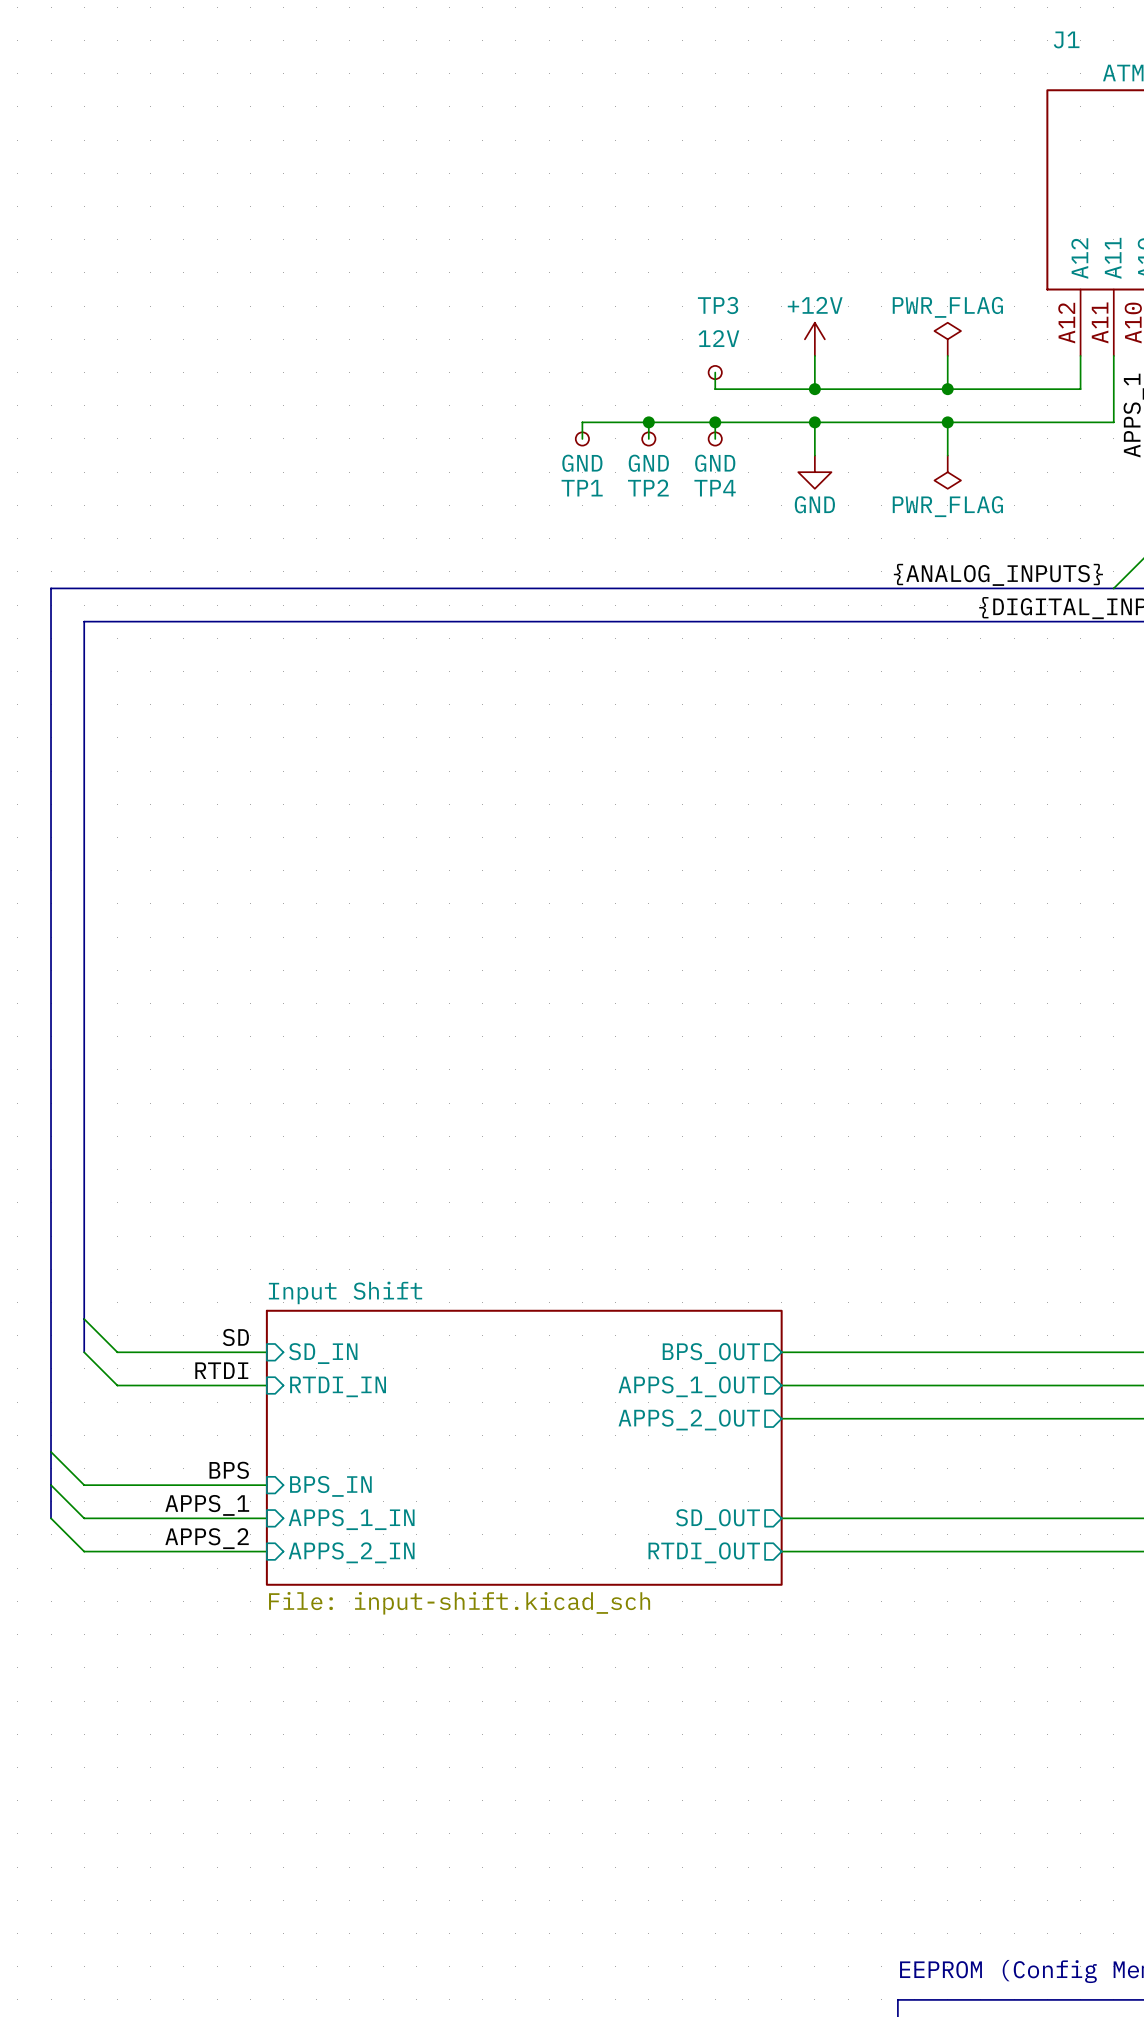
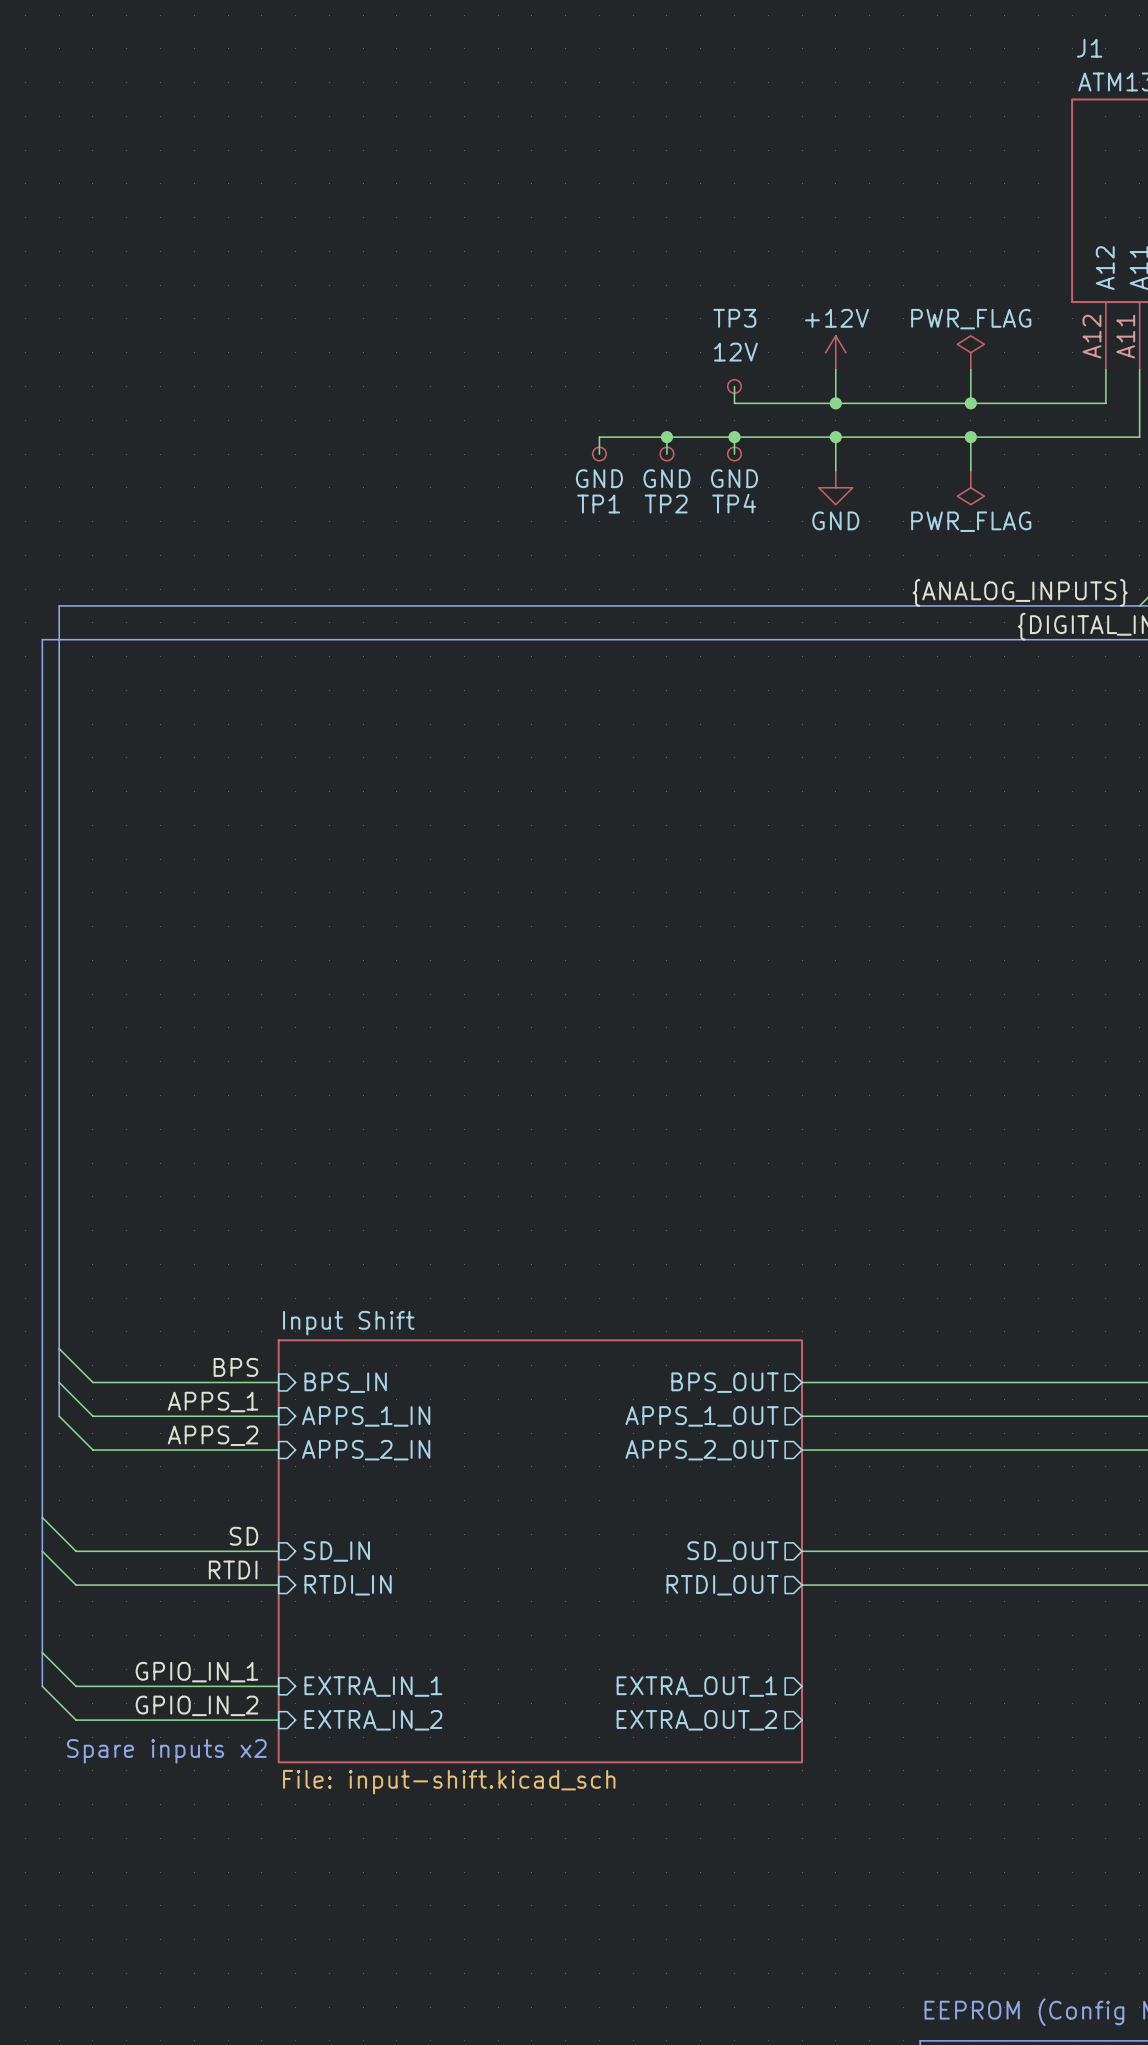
bus: (84, 621) (84, 1352) -> (92, 639) (42, 639) (42, 1686)
wire: (84, 1319) (117, 1352) -> (59, 1348) (92, 1382) (126, 1382)
label: SD (235, 1337) -> BPS (235, 1367)
wire: (84, 1352) (117, 1385) -> (59, 1382) (92, 1416) (126, 1416)
sheet pin: SD_IN (323, 1353) -> BPS_IN (345, 1382)
label: RTDI (221, 1370) -> APPS_1 (213, 1401)
bus: (51, 1385) (51, 1518) -> none
sheet pin: RTDI_IN (338, 1386) -> APPS_1_IN (366, 1416)
label: none -> APPS_2 (213, 1435)
sheet pin: none -> APPS_2_IN (366, 1450)
sheet Input Shift: File: input-shift.kicad_sch (524, 1447) -> none
wire: (51, 1451) (84, 1485) (266, 1485) -> (59, 1416) (92, 1450) (278, 1450)
label: BPS (229, 1470) -> none
wire: (51, 1485) (84, 1518) -> (42, 1517) (76, 1551) (92, 1551)
sheet pin: BPS_IN (330, 1486) -> none
label: APPS_1 (207, 1505) -> SD (243, 1536)
wire: (51, 1518) (84, 1551) -> (42, 1551) (76, 1585) (92, 1585)
sheet Input Shift: none -> File: input-shift.kicad_sch (540, 1551)
sheet pin: APPS_1_IN (351, 1519) -> SD_IN (336, 1551)
label: APPS_2 (207, 1538) -> RTDI (233, 1570)
sheet pin: APPS_2_IN (351, 1552) -> RTDI_IN (348, 1585)
wire: none -> (42, 1652) (76, 1686) (278, 1686)
label: none -> GPIO_IN_1 (196, 1672)
wire: none -> (42, 1686) (76, 1720) (278, 1720)
sheet pin: none -> EXTRA_IN_1 (373, 1686)
sheet pin: none -> EXTRA_OUT_1 (696, 1686)
label: none -> GPIO_IN_2 (196, 1705)
sheet pin: none -> EXTRA_IN_2 (373, 1720)
sheet pin: none -> EXTRA_OUT_2 (696, 1720)
text: none -> Spare inputs x2 (166, 1751)

